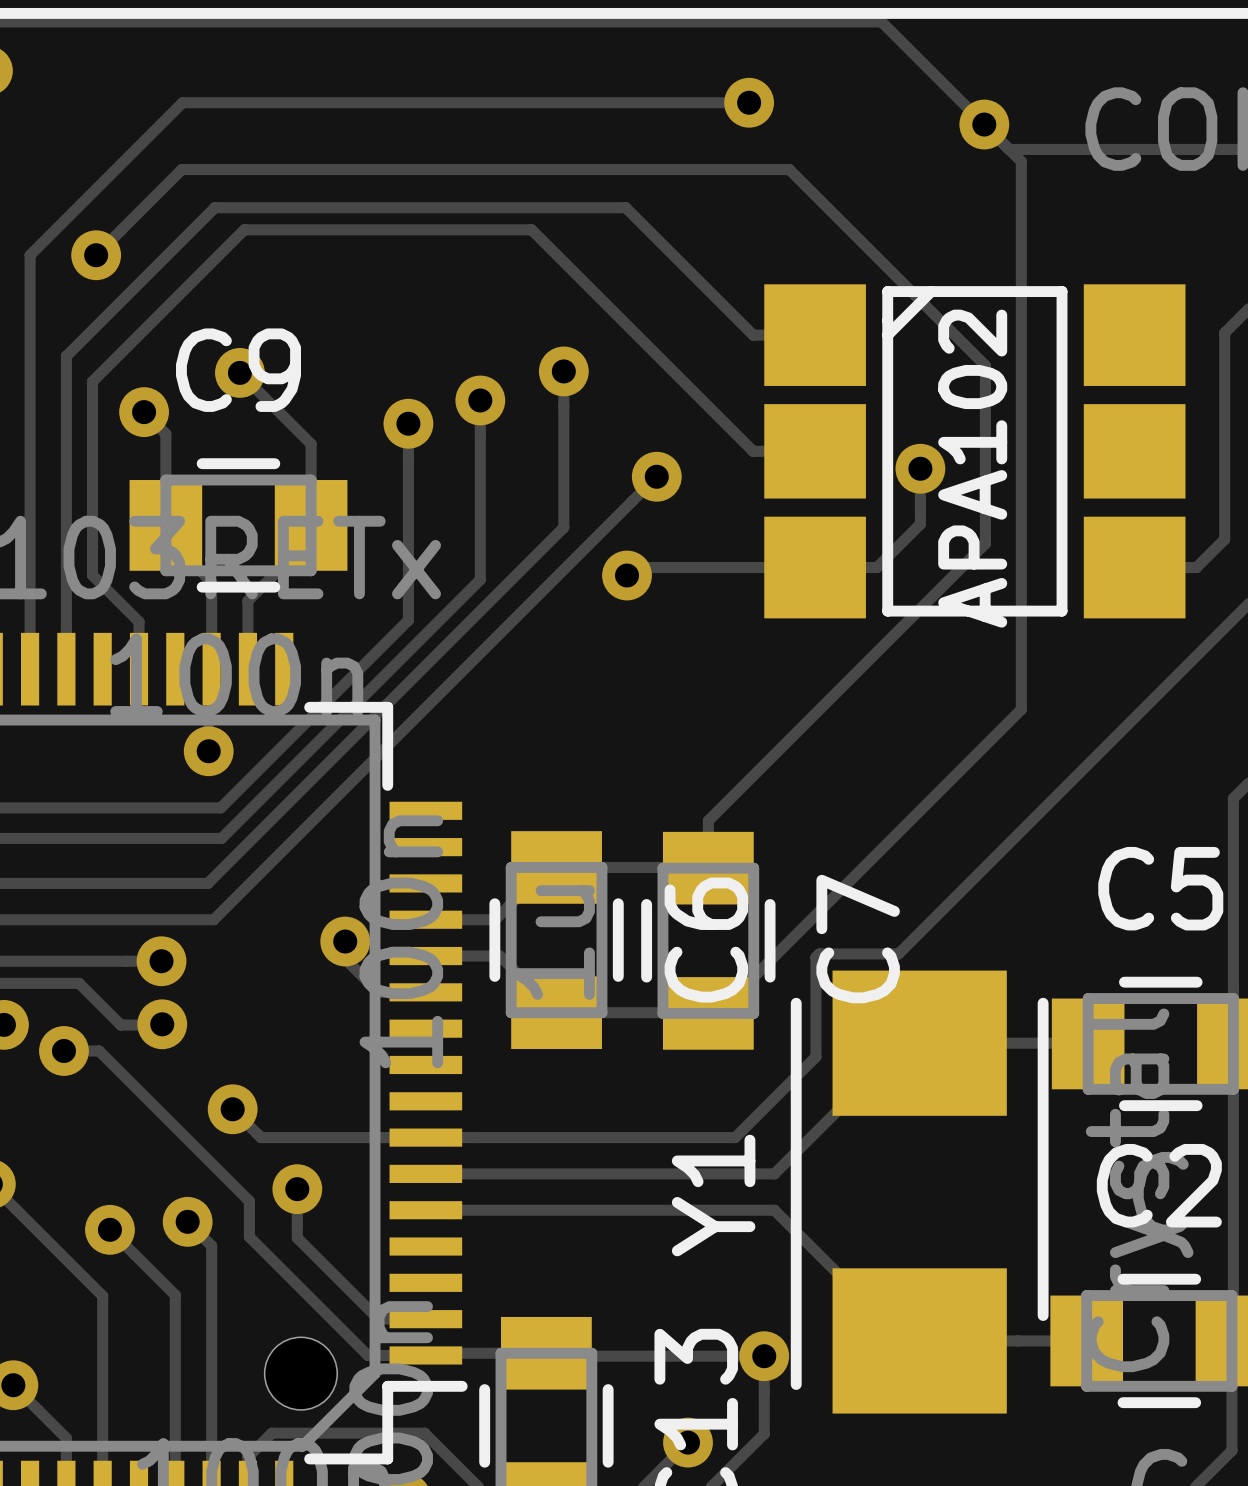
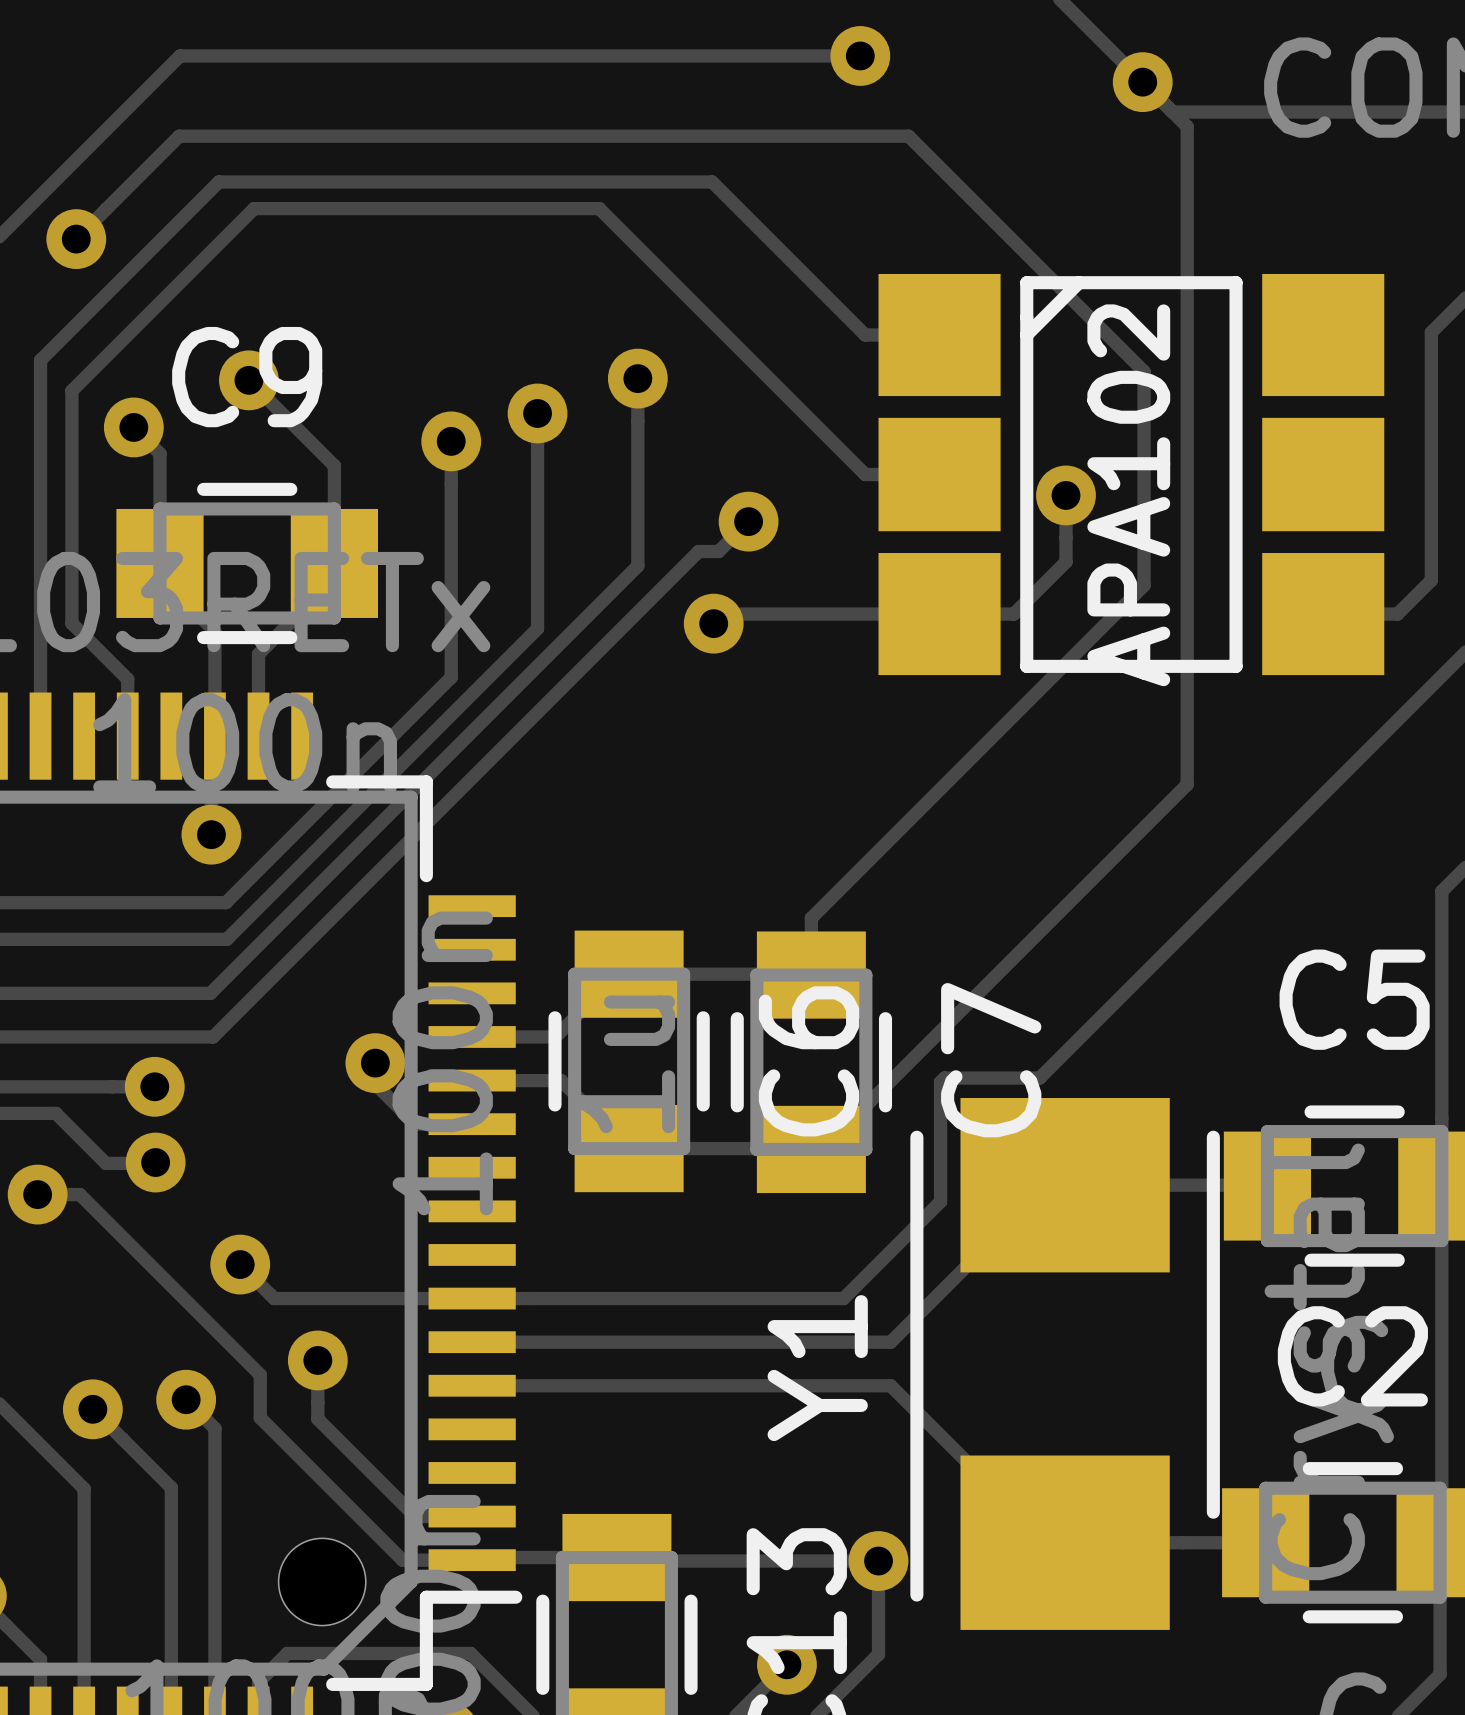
track: (656, 476) (213, 919) (210, 919) -> (748, 521) (718, 551) (698, 551) (213, 1036)
via position: (656, 476) -> (748, 521)

